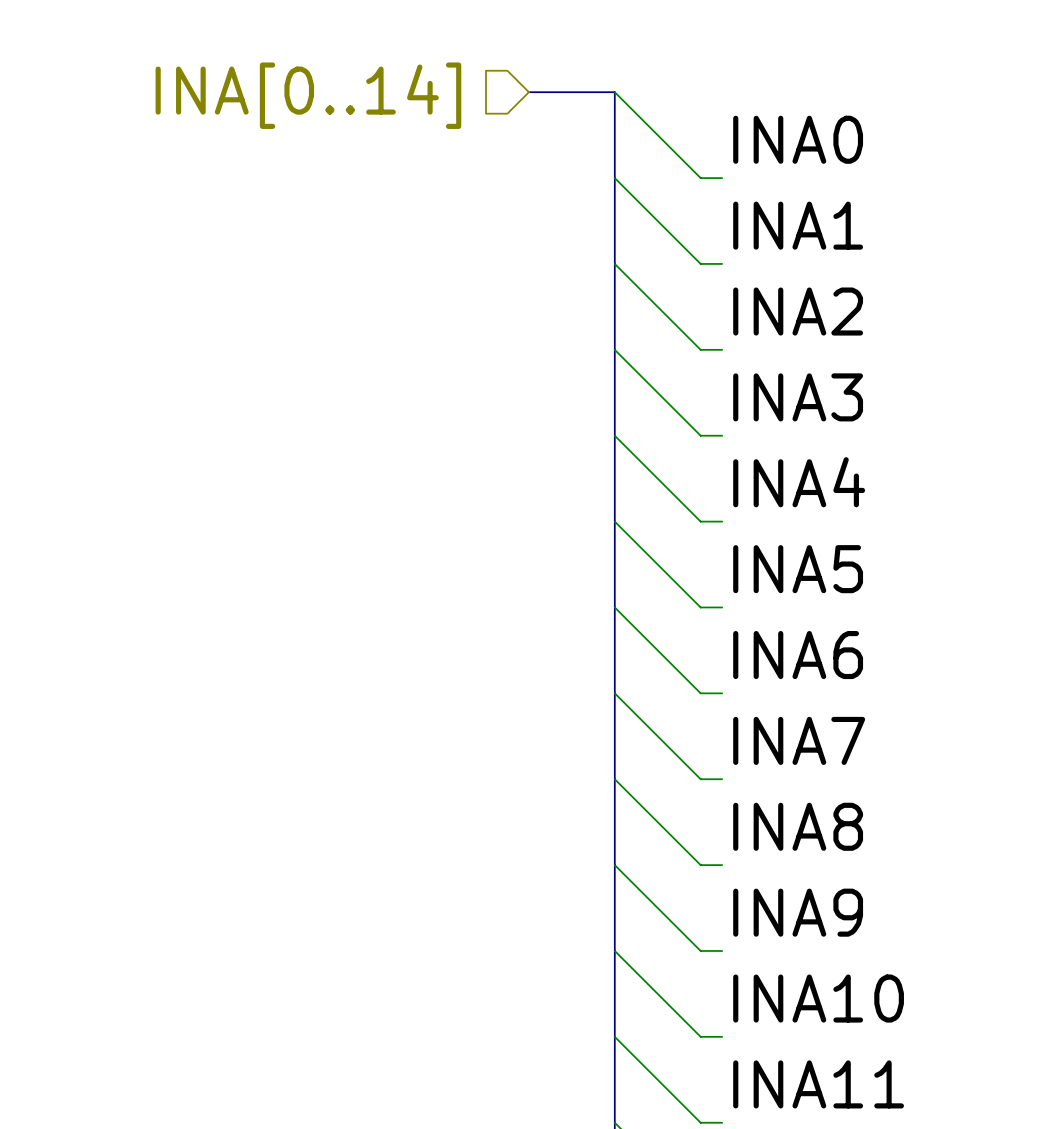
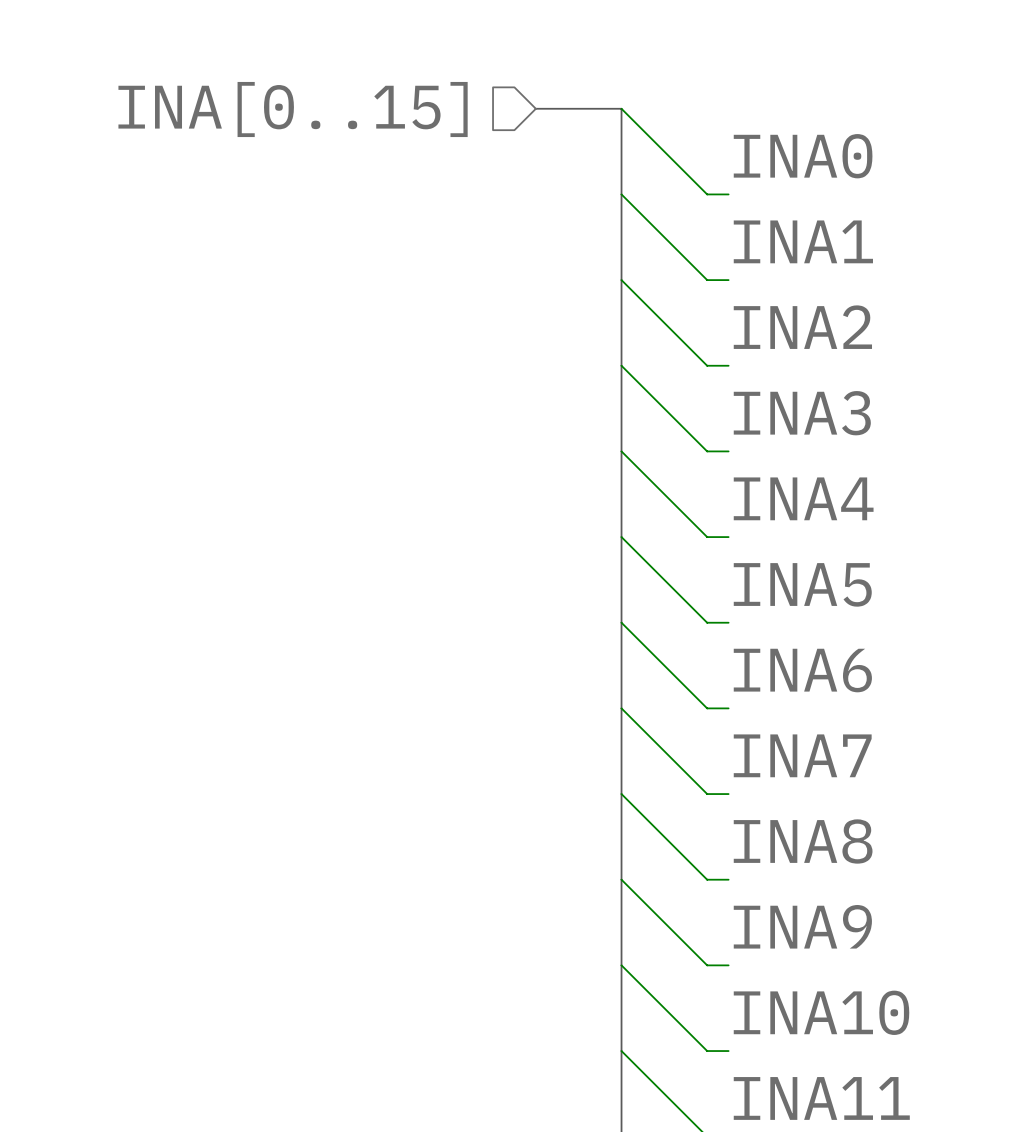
hierarchical label: INA[0..14] (308, 95) -> INA[0..15] (293, 109)

